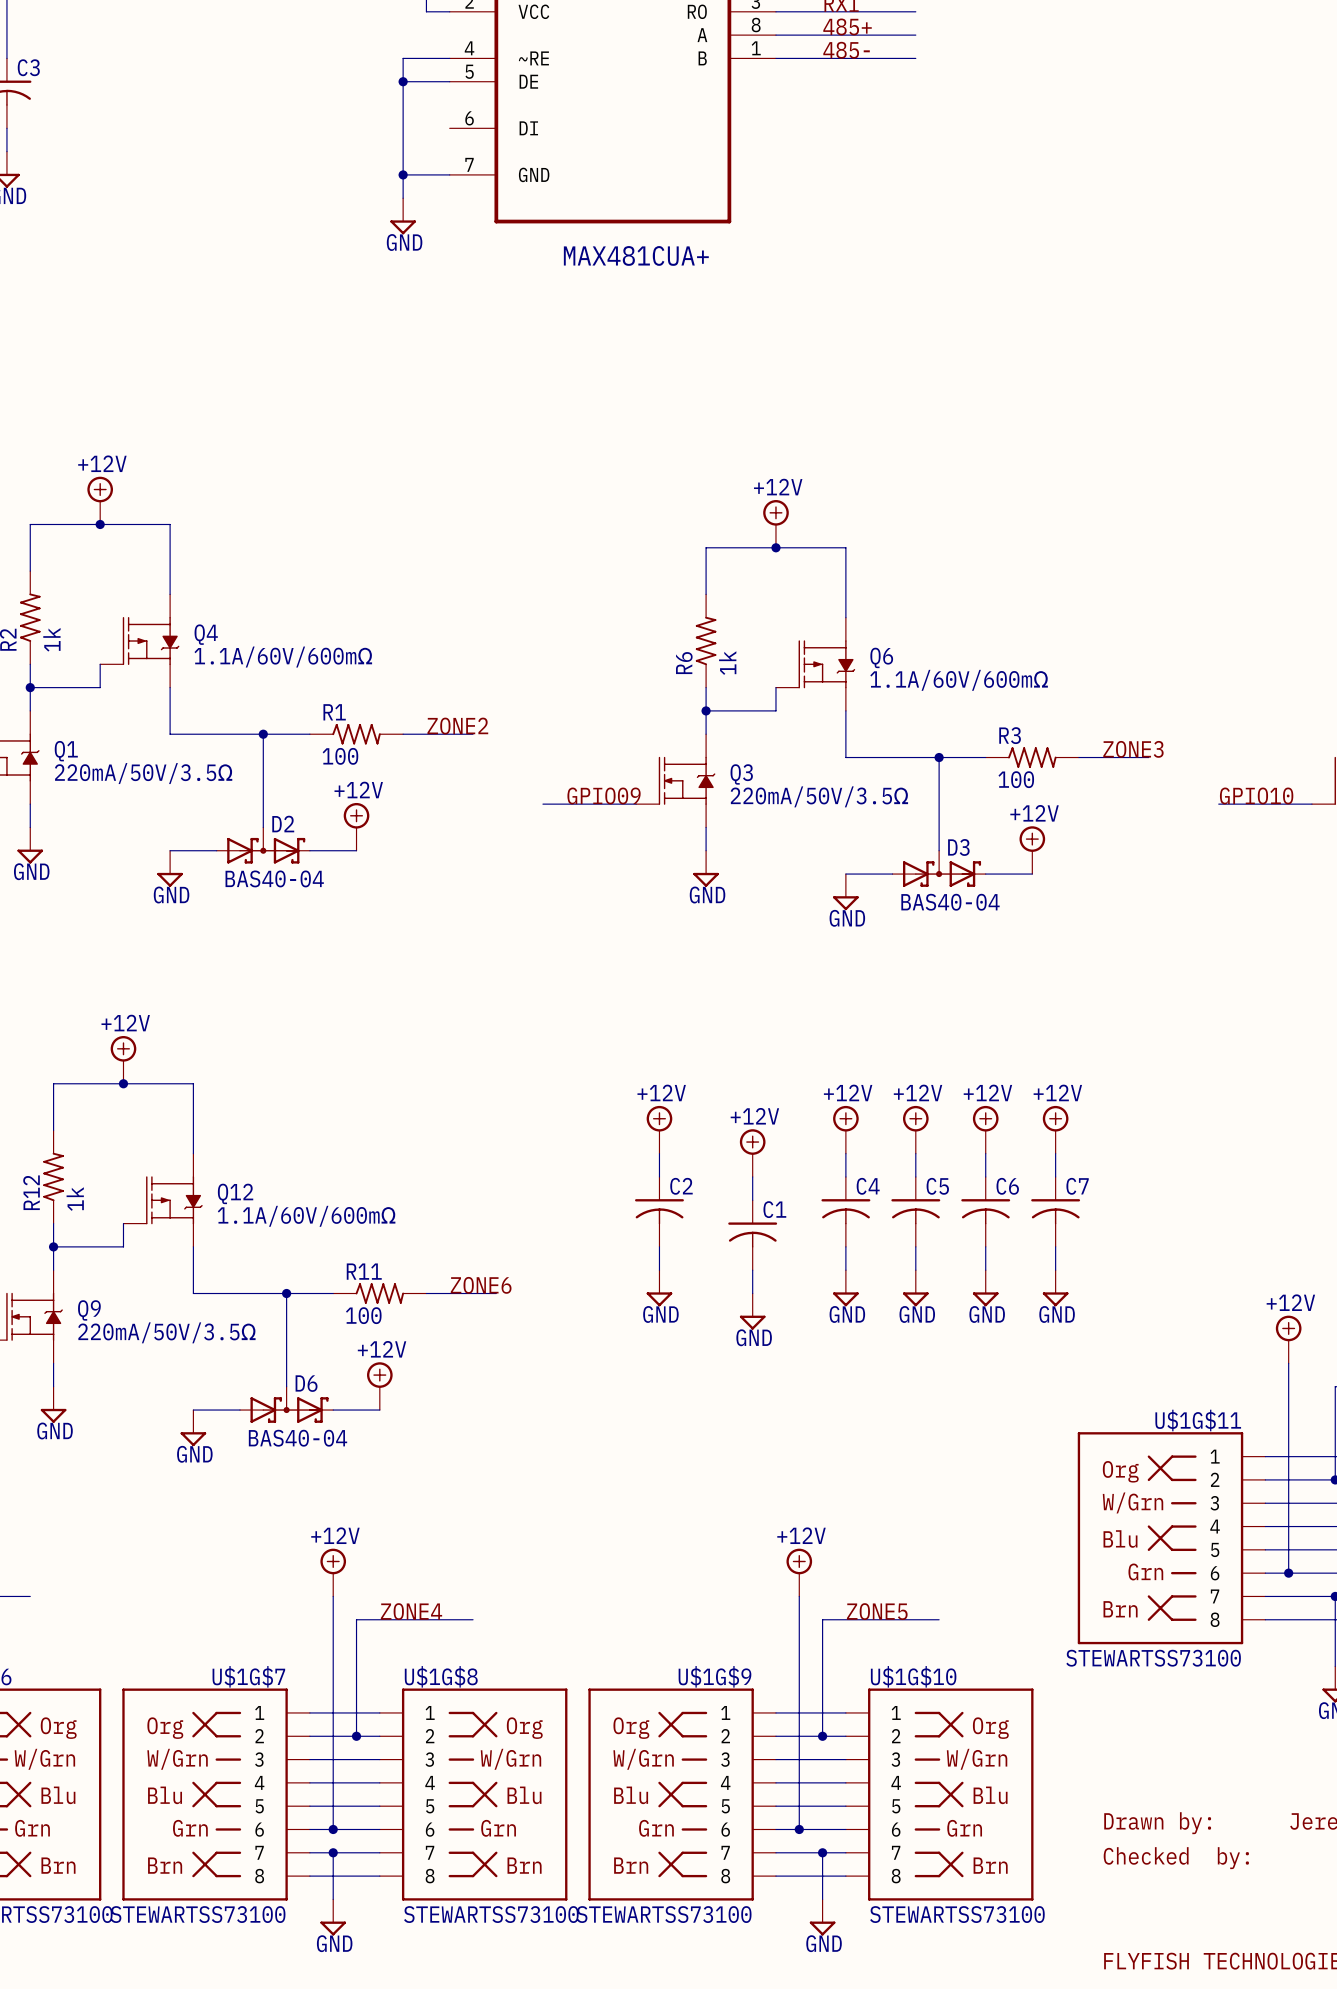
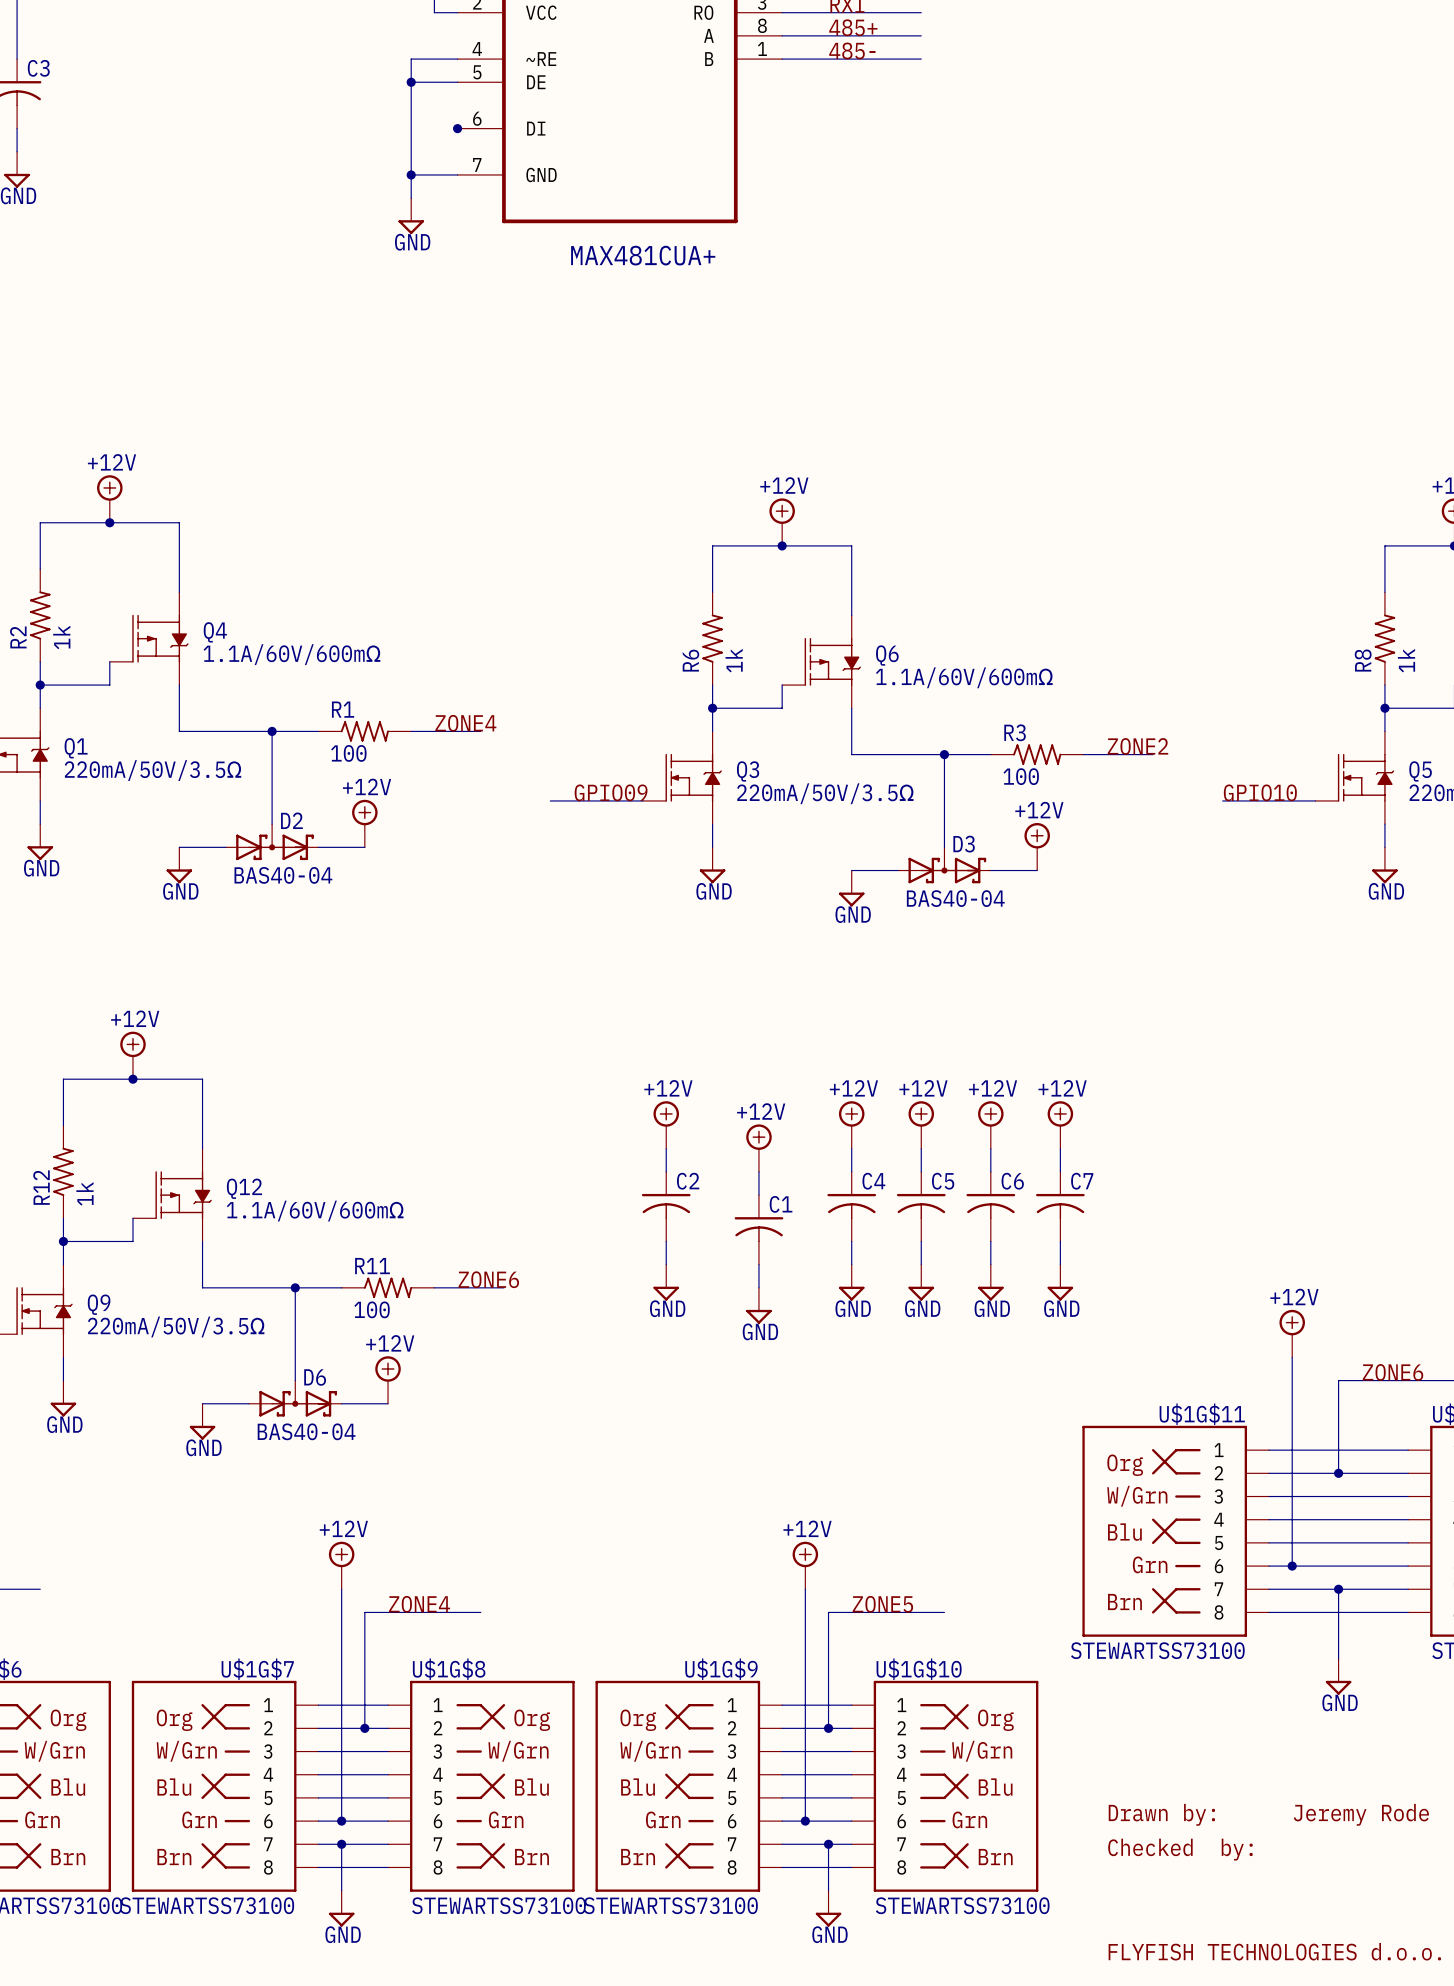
junction: none -> (457, 128)
label: ZONE2 (457, 726) -> ZONE4 (465, 723)
label: ZONE3 (1133, 749) -> ZONE2 (1137, 746)

